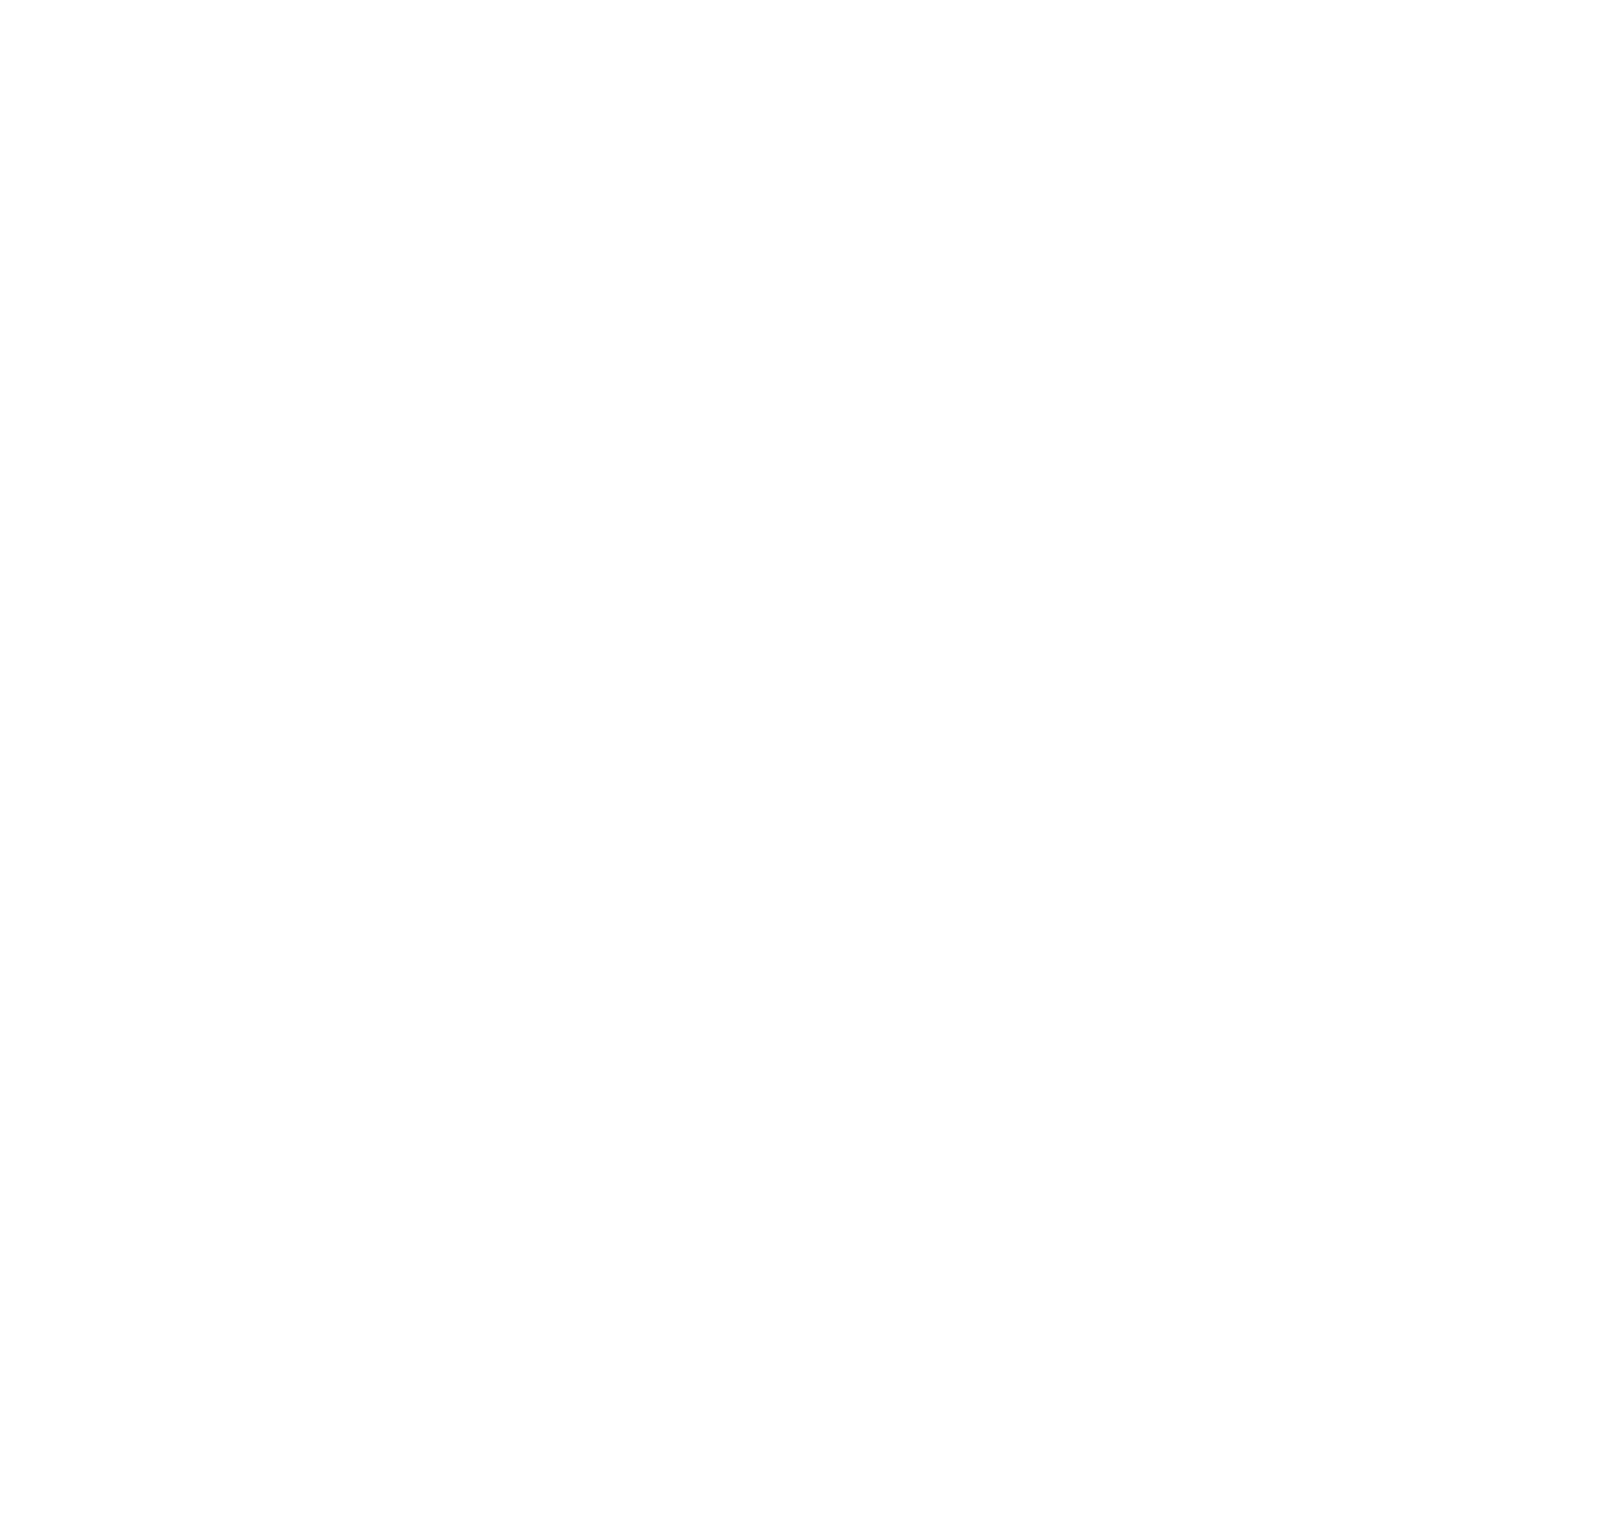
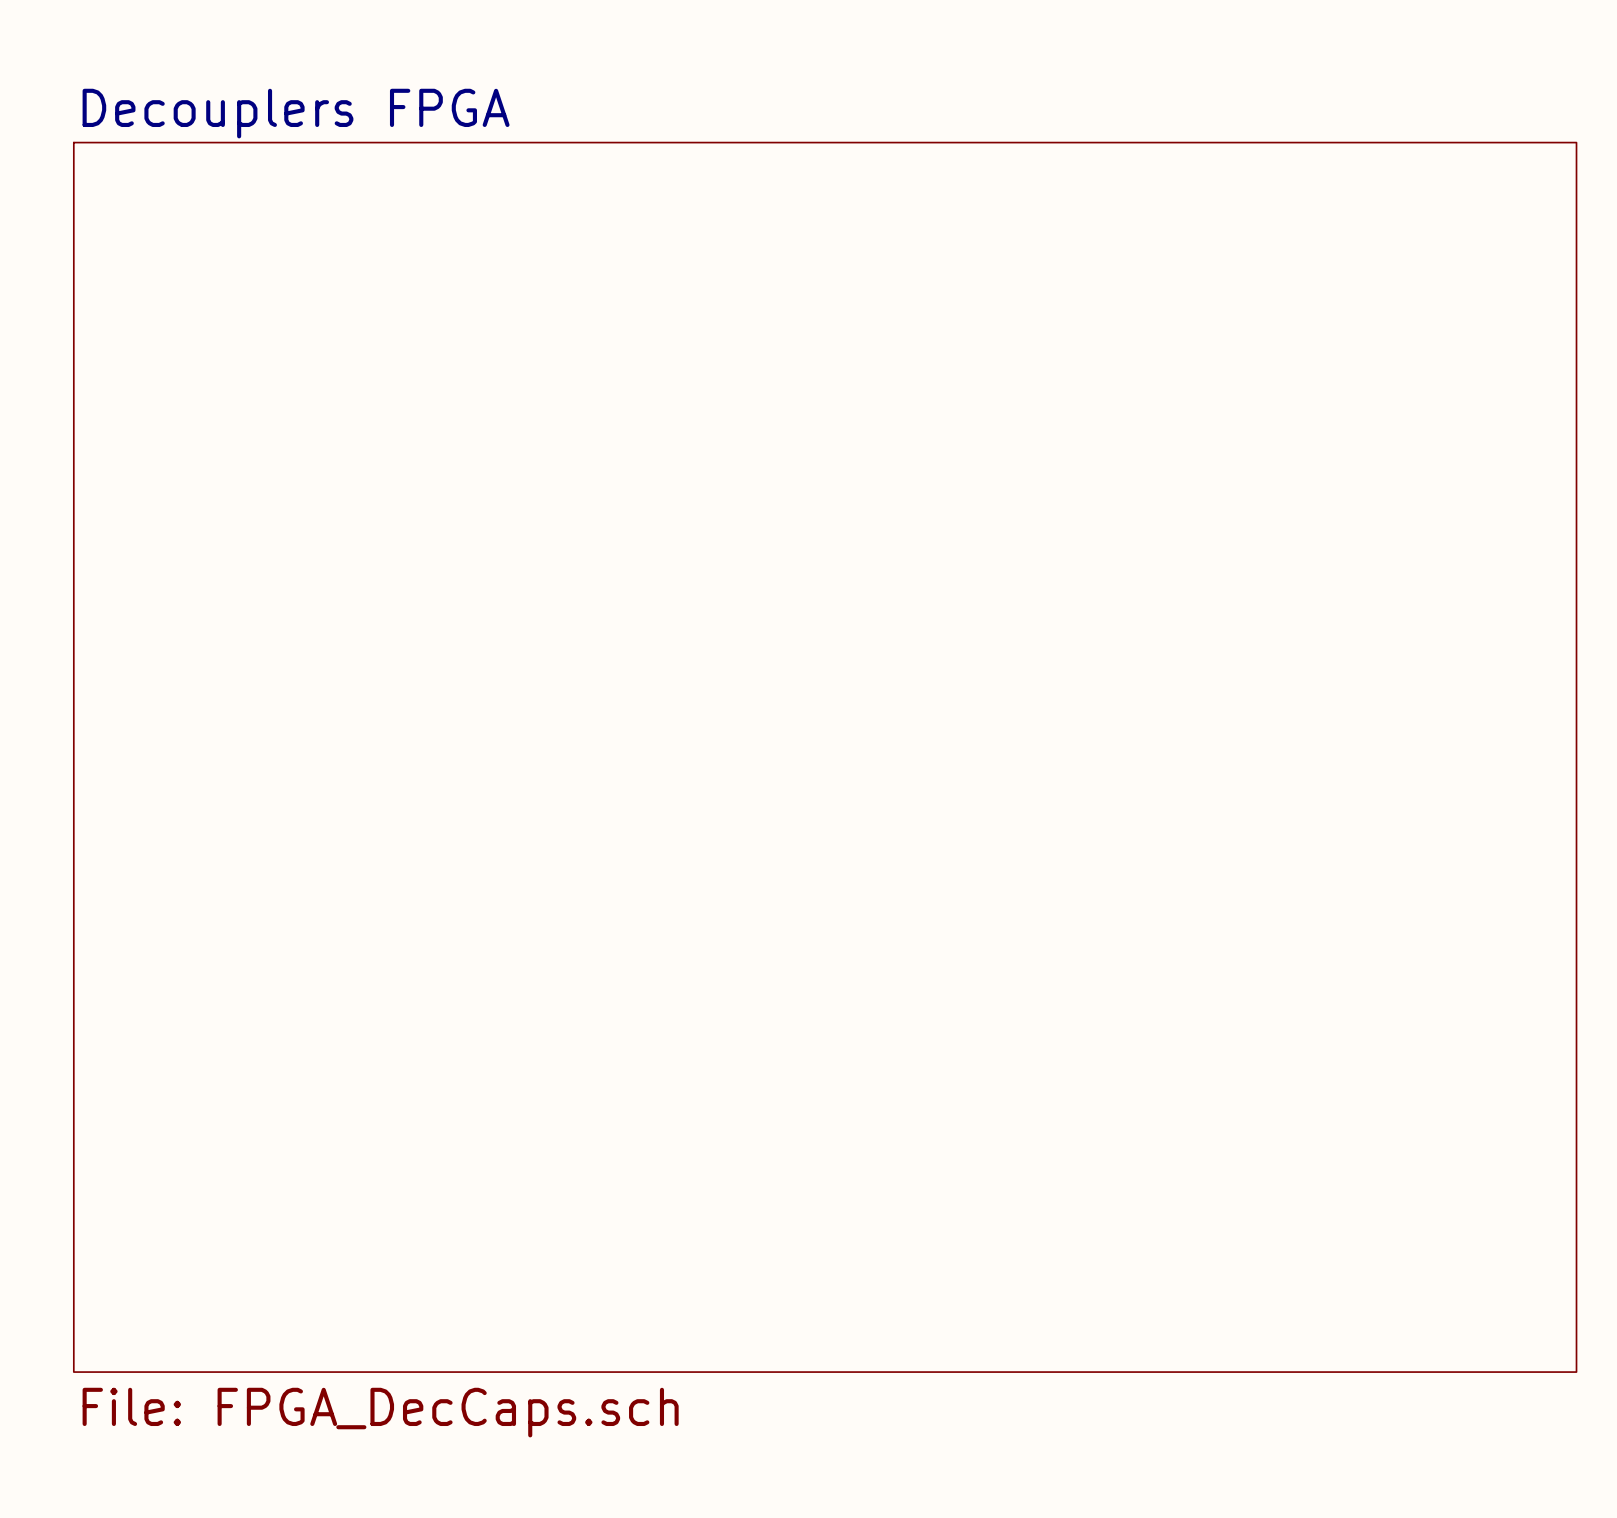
sheet Decouplers FPGA: none -> File: FPGA_DecCaps.sch (825, 757)

